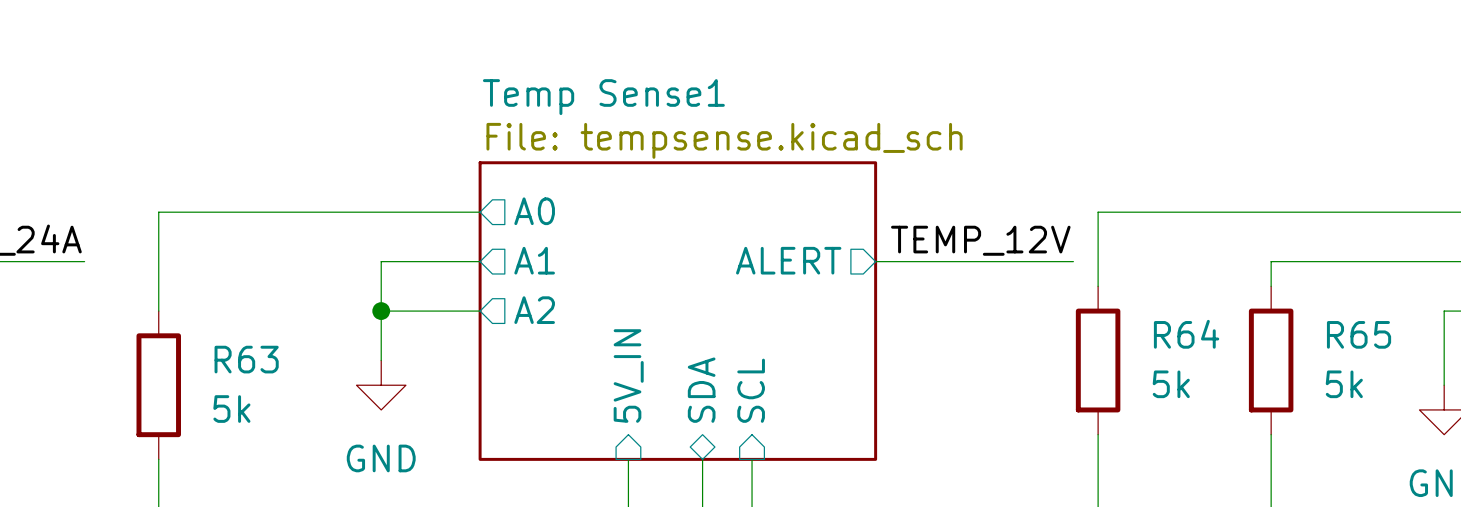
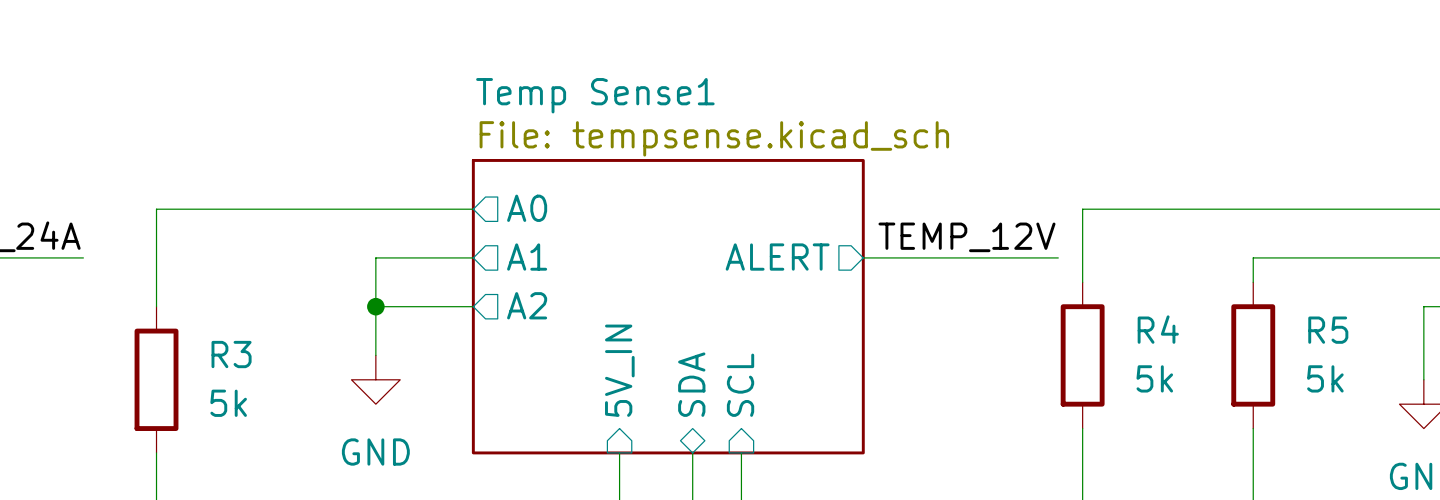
R64 name: R64 (1186, 334) -> R4 (1158, 329)
R65 name: R65 (1359, 334) -> R5 (1328, 330)
R63 name: R63 (246, 359) -> R3 (231, 354)

